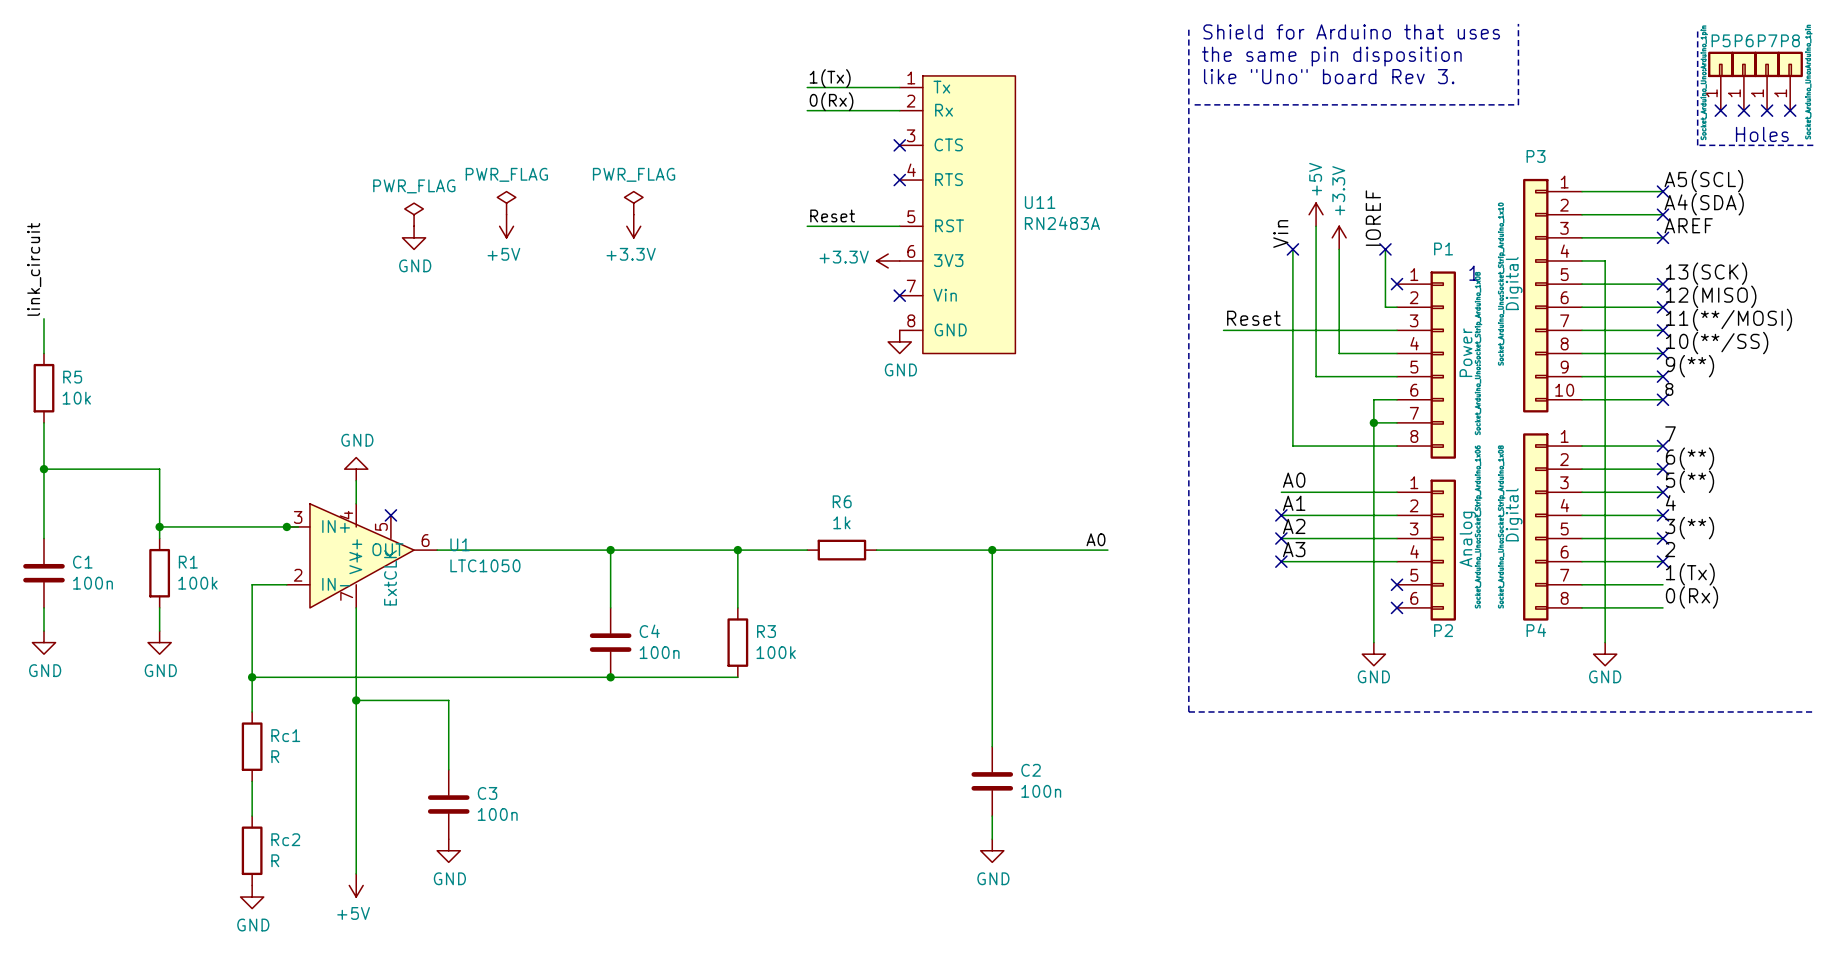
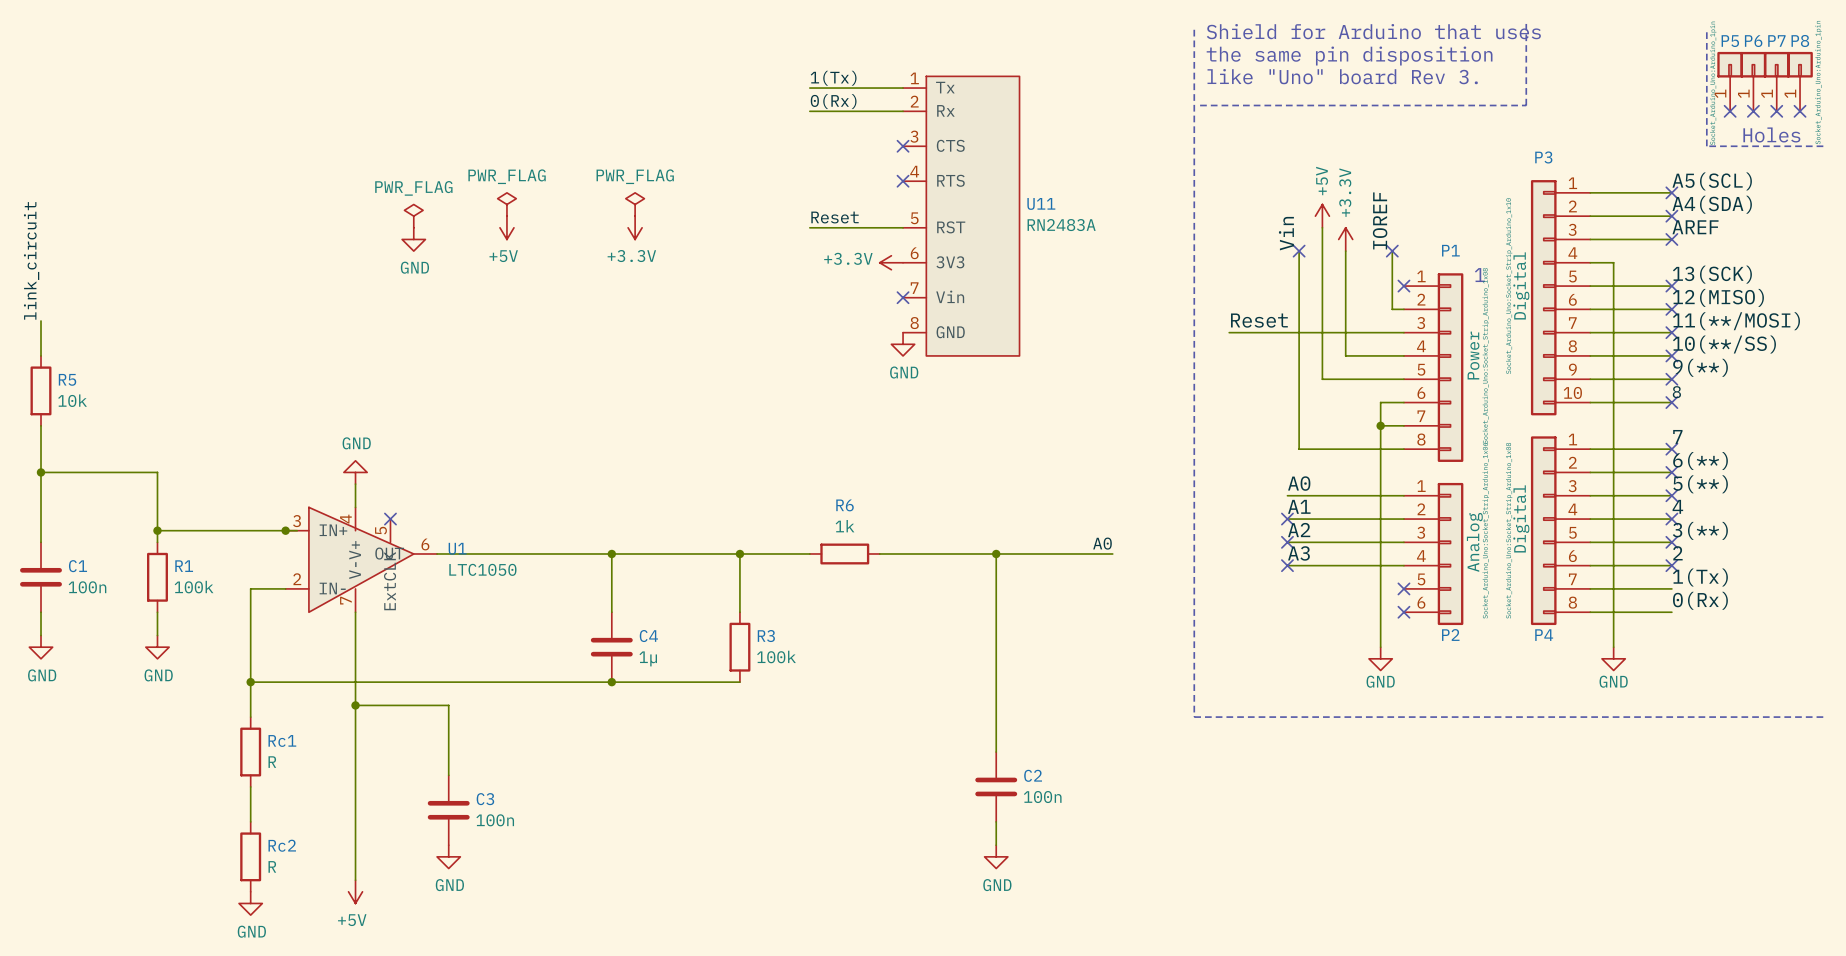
C4 value: 100n (659, 652) -> 1µ (648, 658)

